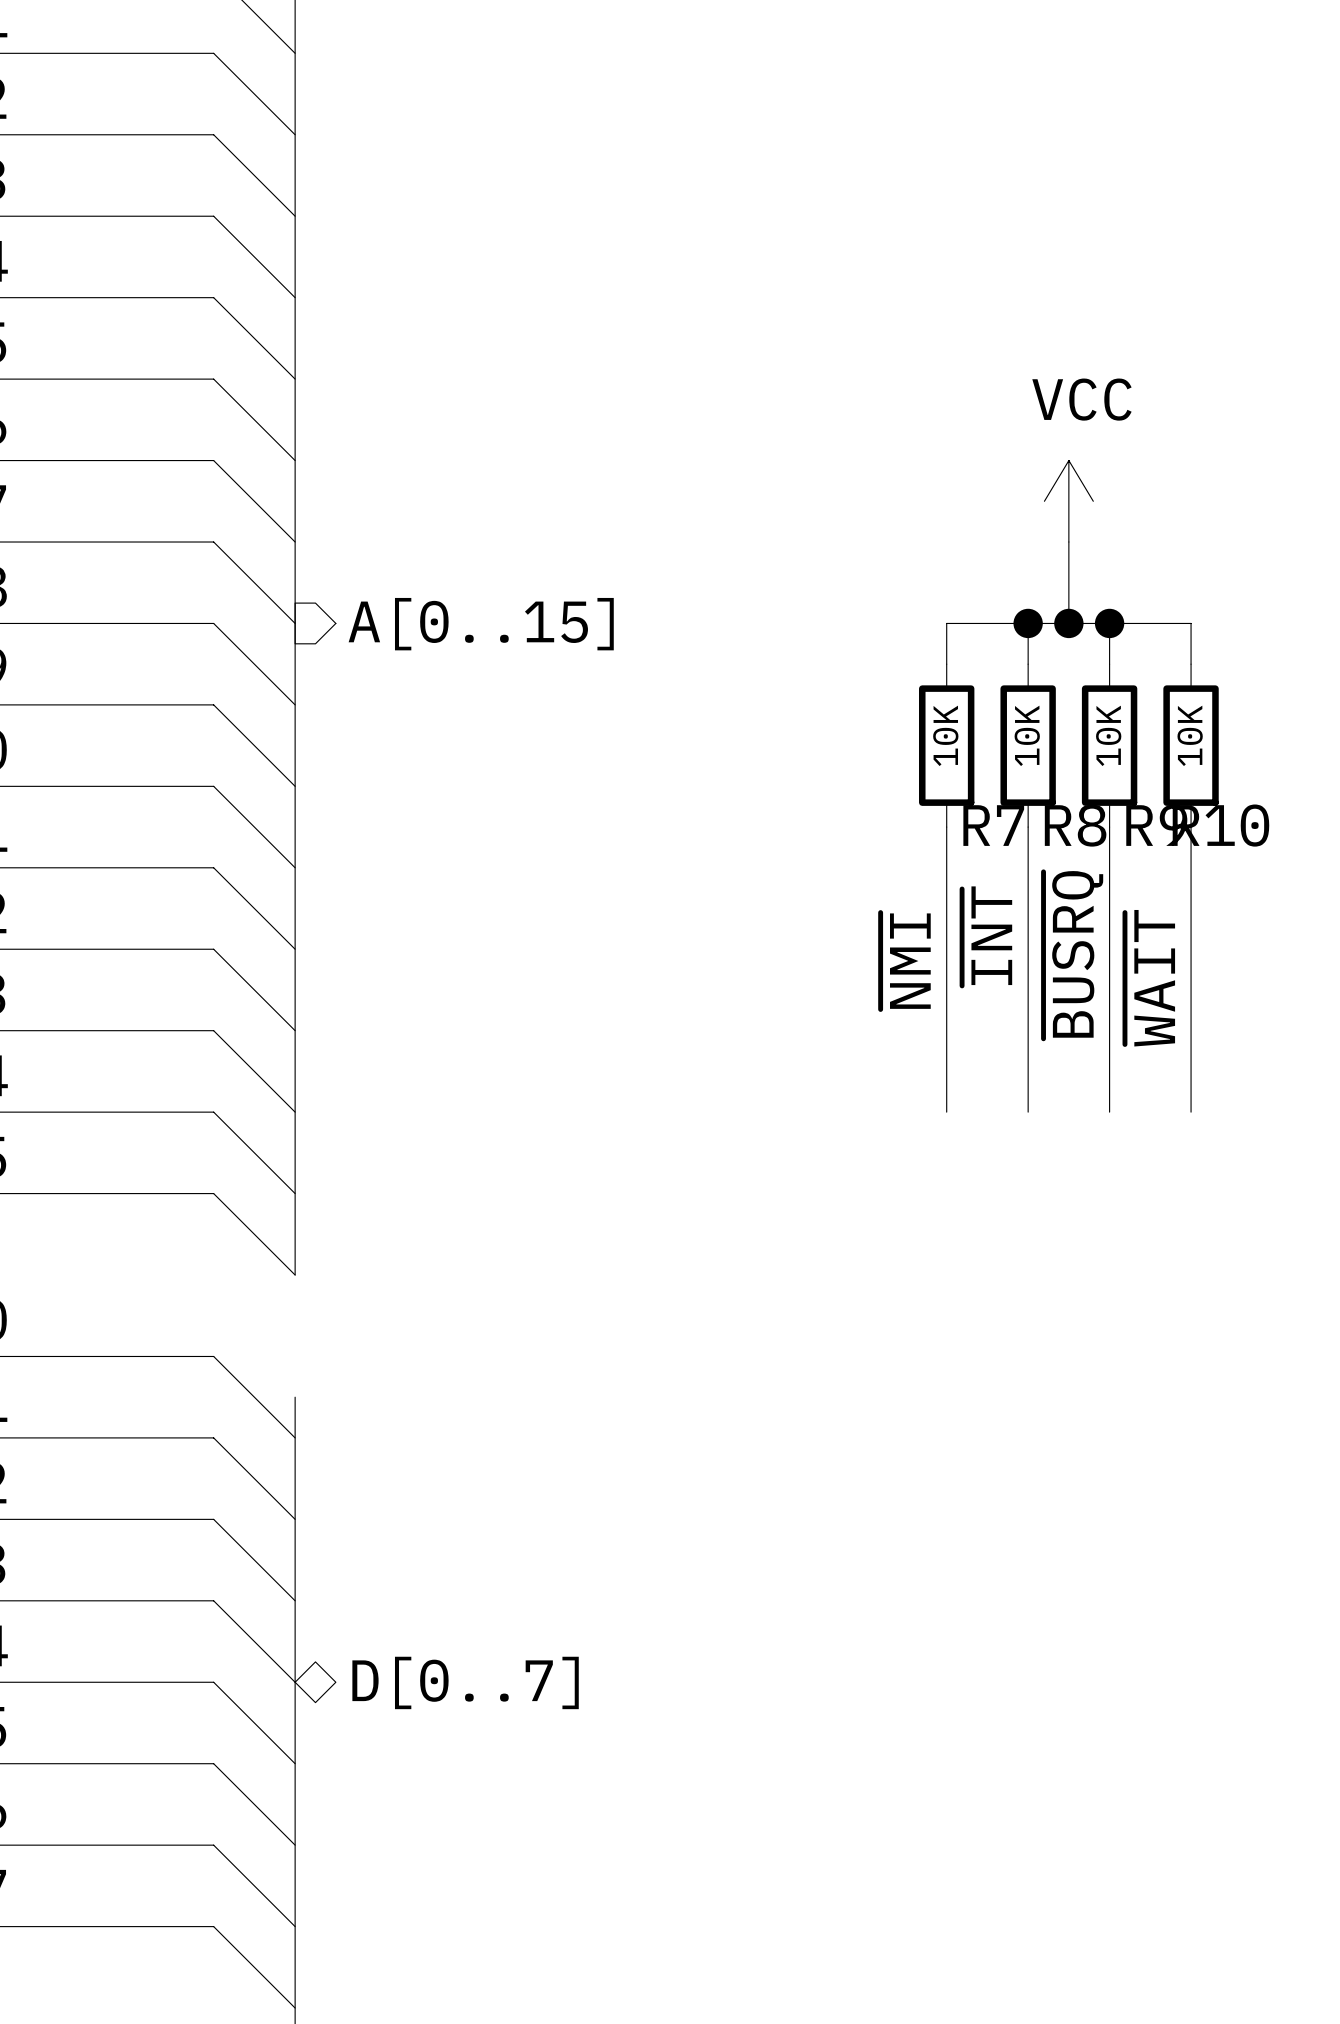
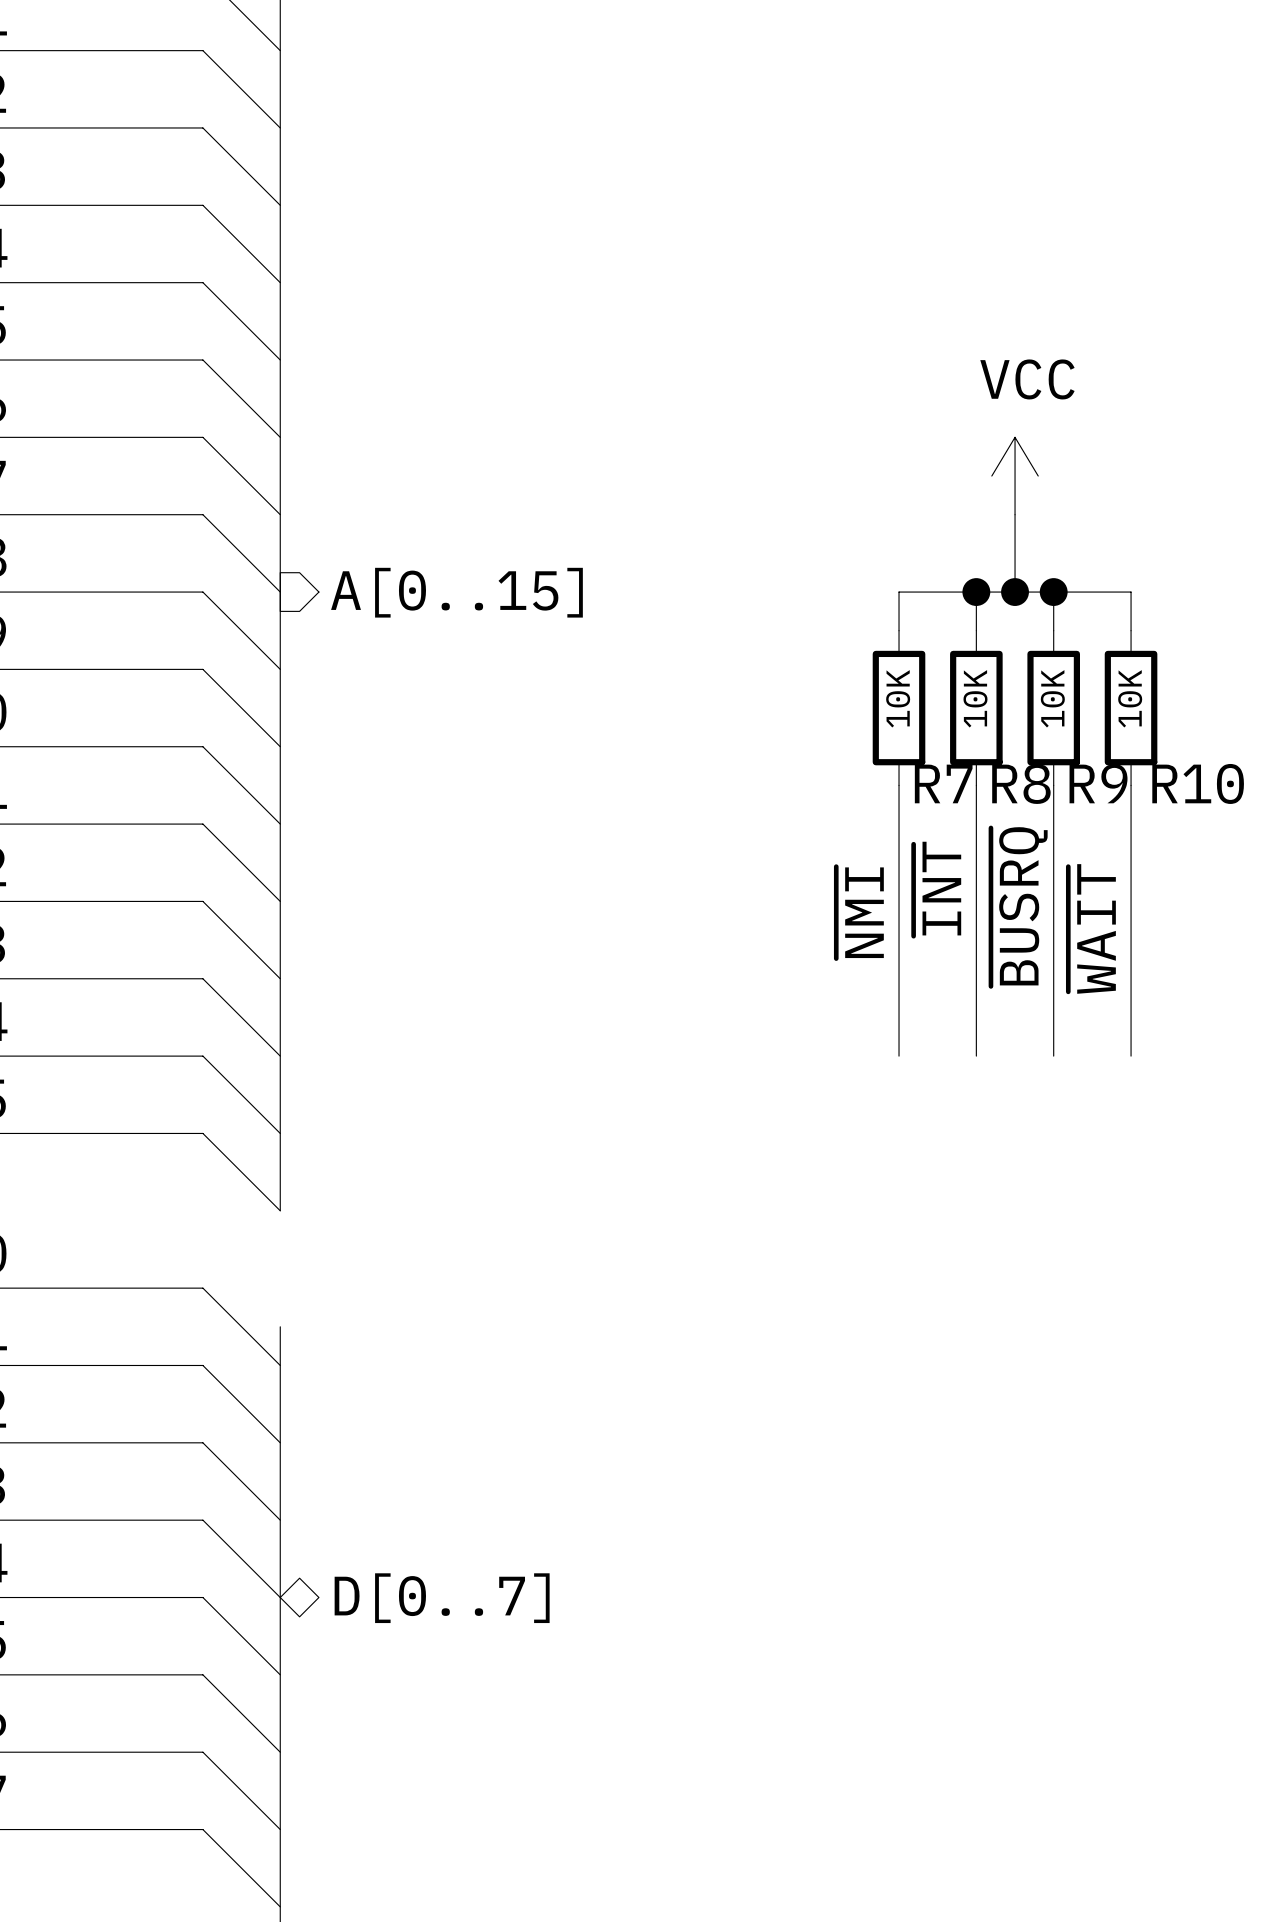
R10 name position: R10 (1220, 825) -> R10 (1198, 783)

